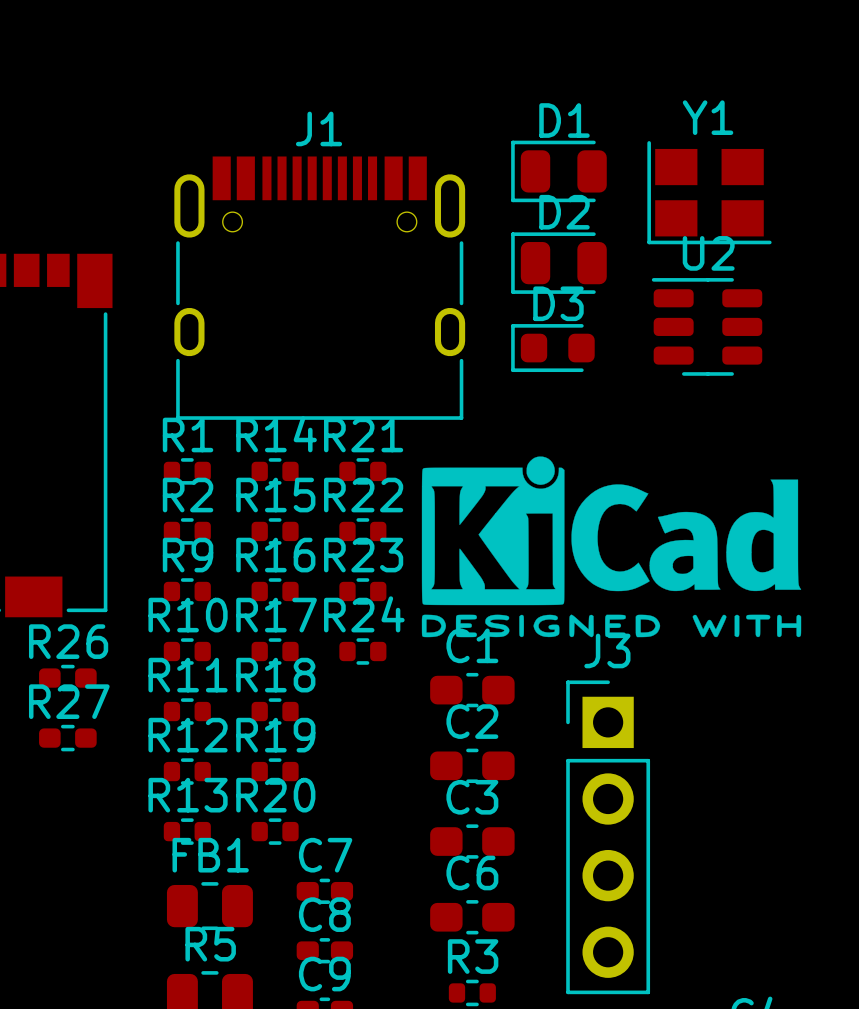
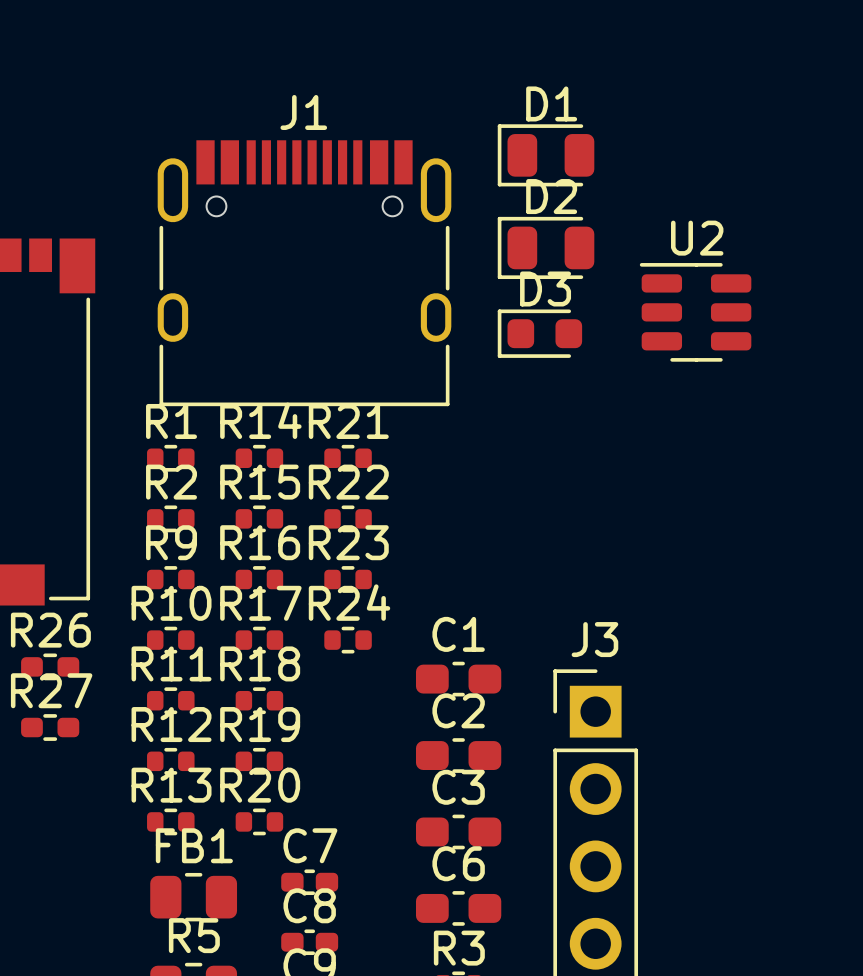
Y1: (709, 192) -> none
drawing: [421, 456, 802, 638] -> none

